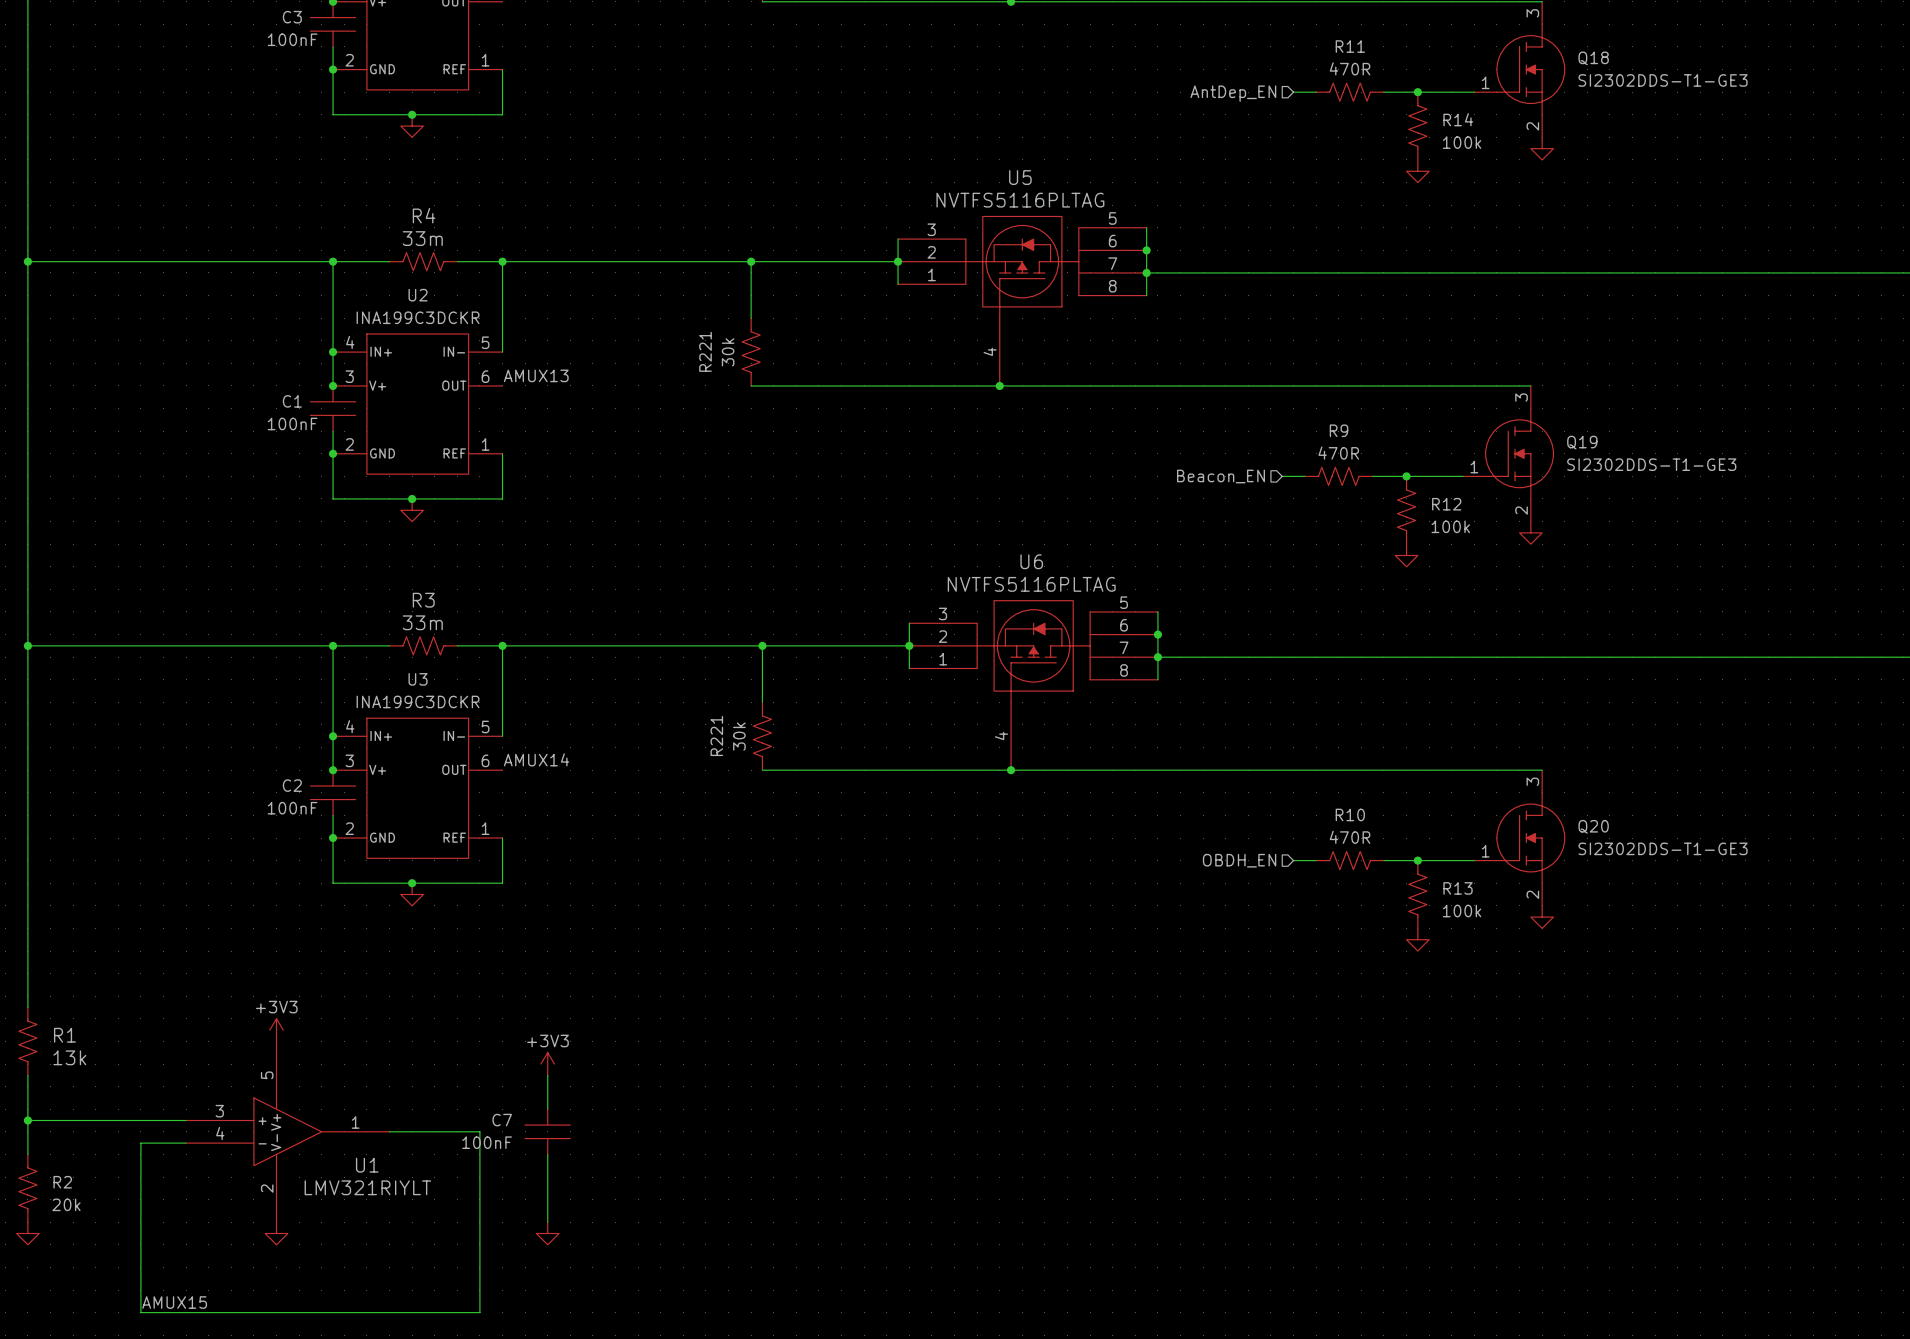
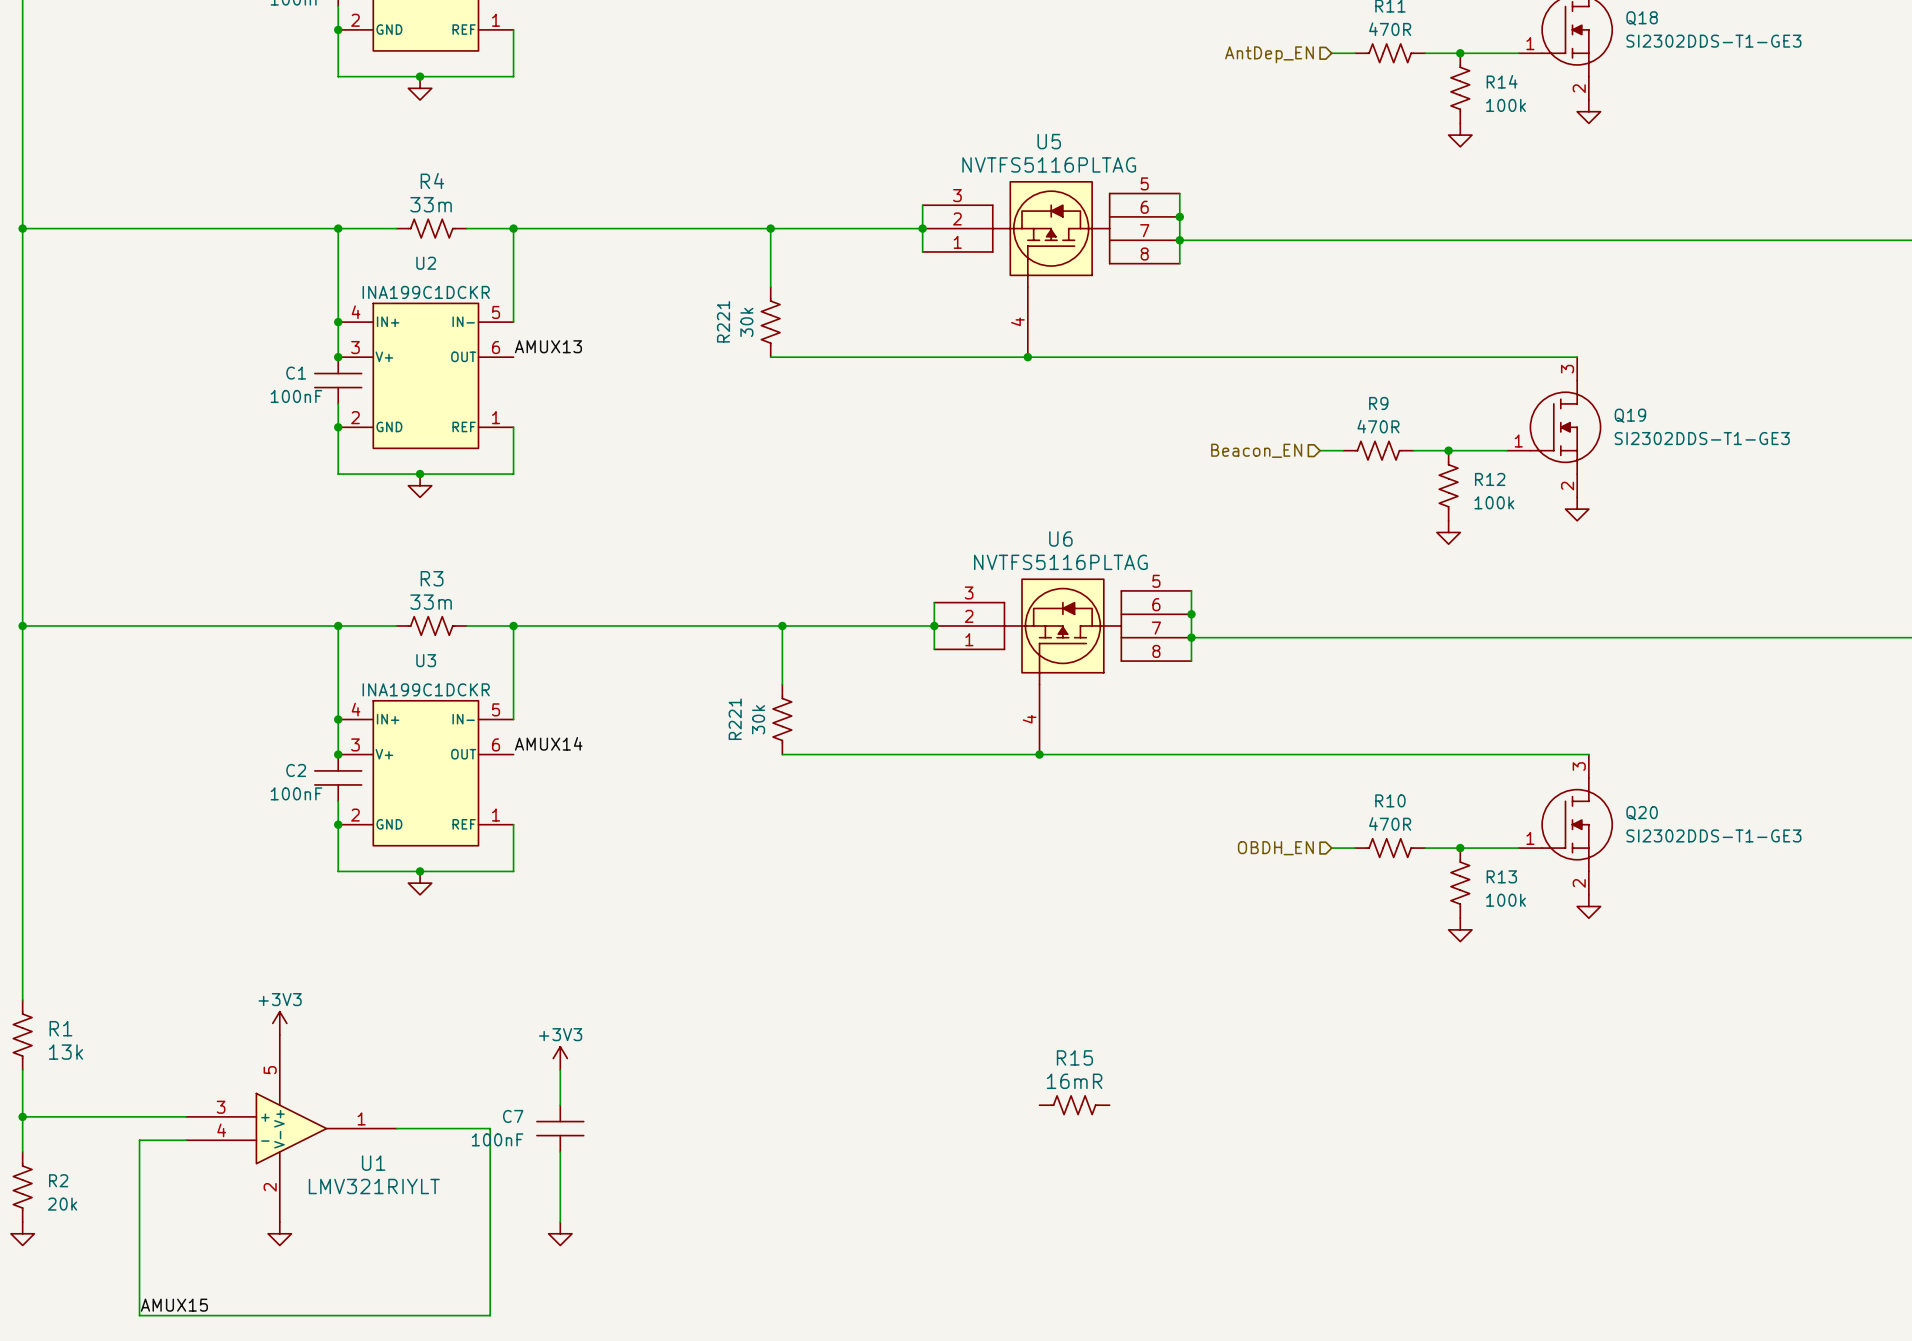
U2 value: INA199C3DCKR (418, 317) -> INA199C1DCKR (426, 292)
U3 value: INA199C3DCKR (418, 701) -> INA199C1DCKR (426, 689)
R15: none -> 16mR (1074, 1105)

